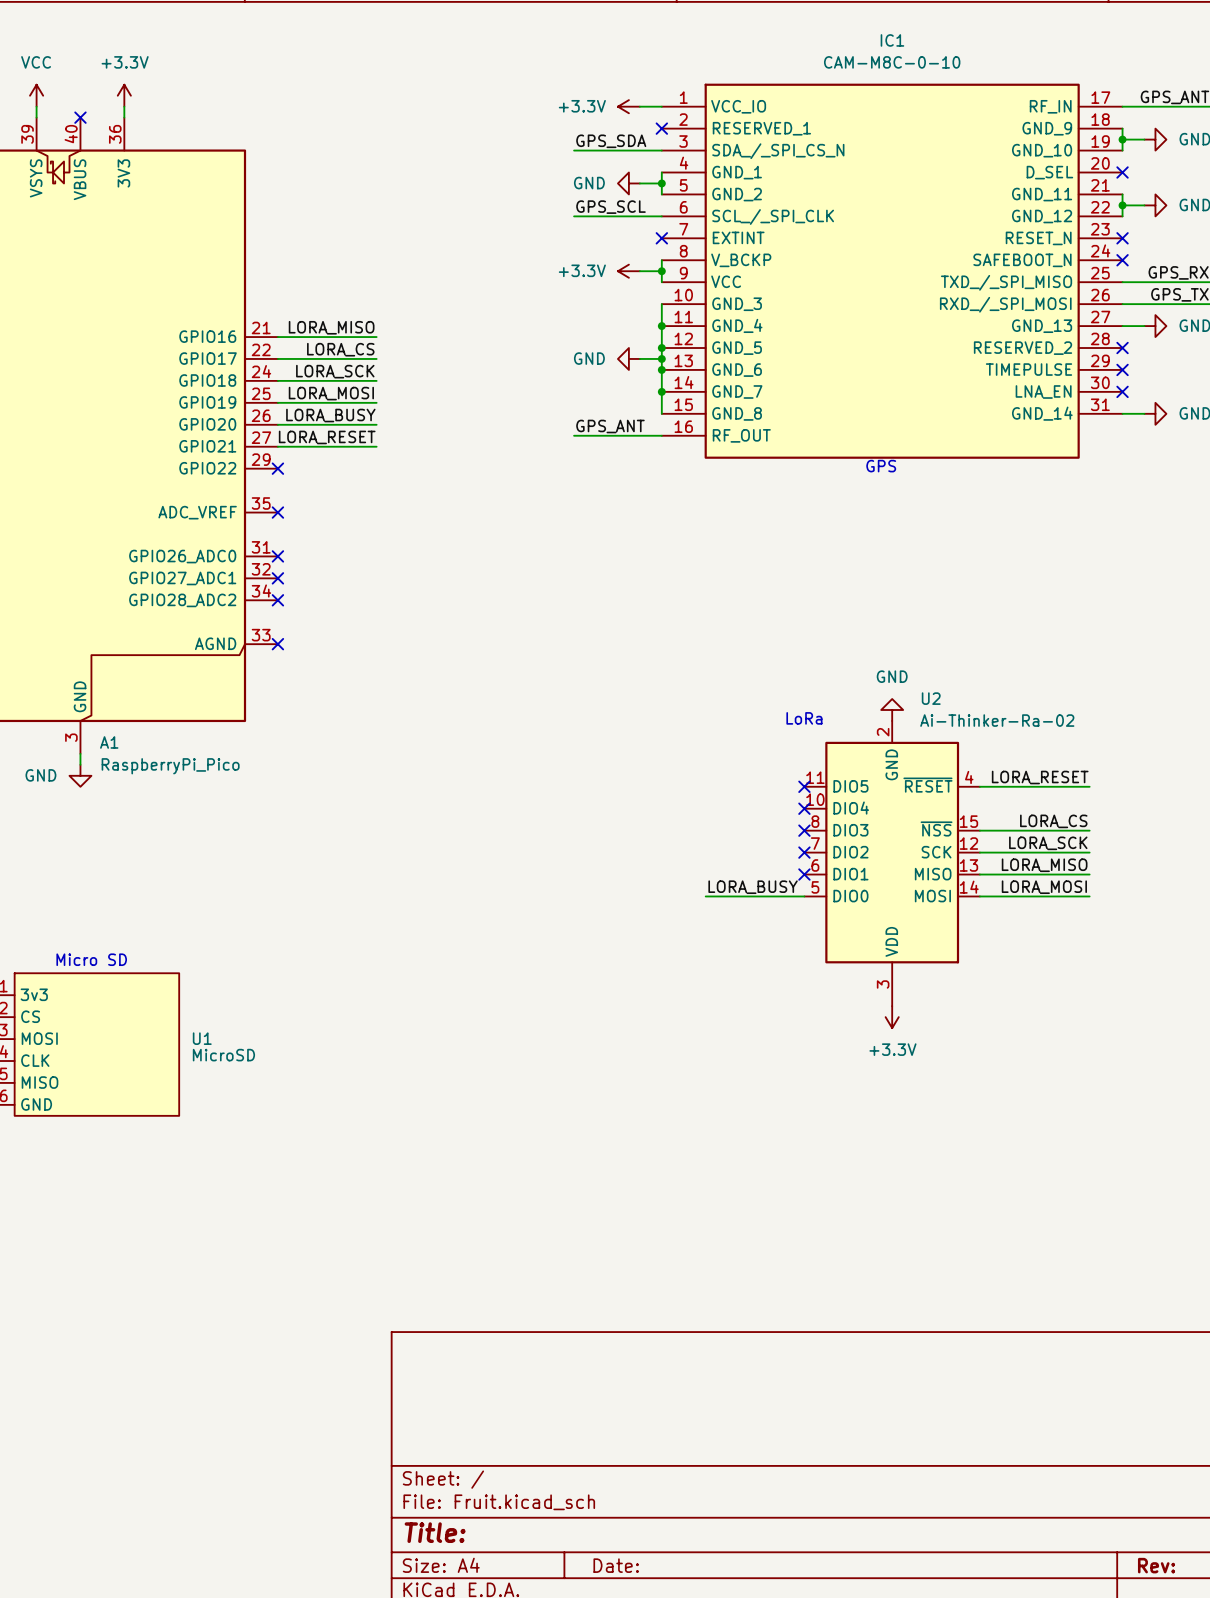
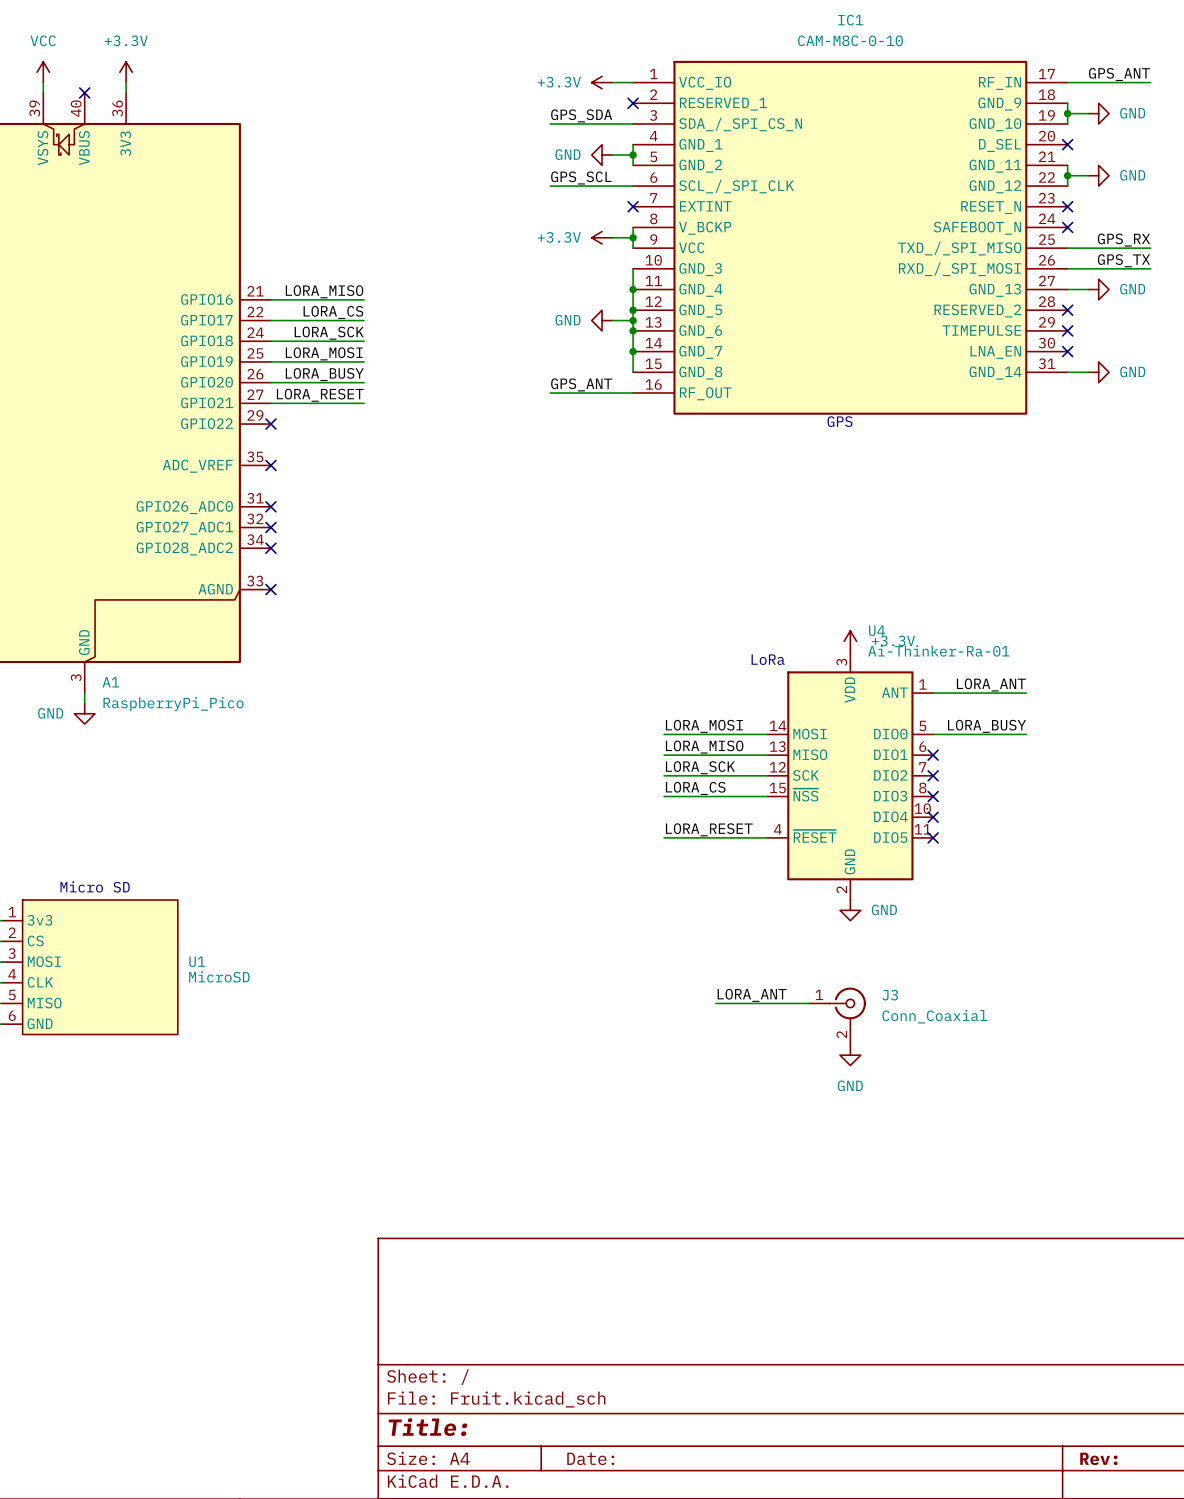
power symbol: none -> +3.3V (850, 641)
power symbol: GND (892, 709) -> none
label: none -> LORA_ANT (991, 684)
wire: none -> (933, 693) (1026, 693)
label: LORA_RESET (1040, 777) -> LORA_BUSY (987, 726)
no-connect mark: (804, 786) -> none
wire: (979, 786) (1089, 786) -> none
label: none -> LORA_MOSI (704, 726)
wire: none -> (664, 734) (767, 734)
wire: none -> (933, 734) (1026, 734)
no-connect mark: (804, 808) -> none
label: none -> LORA_MISO (704, 747)
wire: none -> (664, 755) (767, 755)
no-connect mark: none -> (933, 755)
label: LORA_CS (1053, 821) -> none
no-connect mark: (804, 830) -> none
wire: (979, 830) (1089, 830) -> none
label: none -> LORA_SCK (700, 767)
wire: none -> (664, 775) (767, 775)
U4: none -> Ai-Thinker-Ra-01 (850, 775)
no-connect mark: none -> (933, 775)
label: LORA_SCK (1048, 843) -> none
no-connect mark: (804, 852) -> none
wire: (979, 852) (1089, 852) -> none
label: none -> LORA_CS (695, 788)
wire: none -> (664, 796) (767, 796)
U2: Ai-Thinker-Ra-02 (892, 863) -> none
no-connect mark: none -> (933, 796)
label: LORA_MISO (1044, 865) -> none
no-connect mark: (804, 874) -> none
wire: (979, 874) (1089, 874) -> none
no-connect mark: none -> (933, 817)
label: LORA_BUSY (753, 887) -> LORA_RESET (709, 829)
label: LORA_MOSI (1044, 887) -> none
wire: (705, 896) (804, 896) -> (715, 1003) (808, 1003)
wire: (979, 896) (1089, 896) -> none
wire: none -> (664, 837) (767, 837)
no-connect mark: none -> (933, 837)
power symbol: none -> GND (850, 910)
power symbol: +3.3V (892, 1017) -> none
label: none -> LORA_ANT (752, 995)
J3: none -> Conn_Coaxial (837, 1016)
power symbol: none -> GND (850, 1055)

